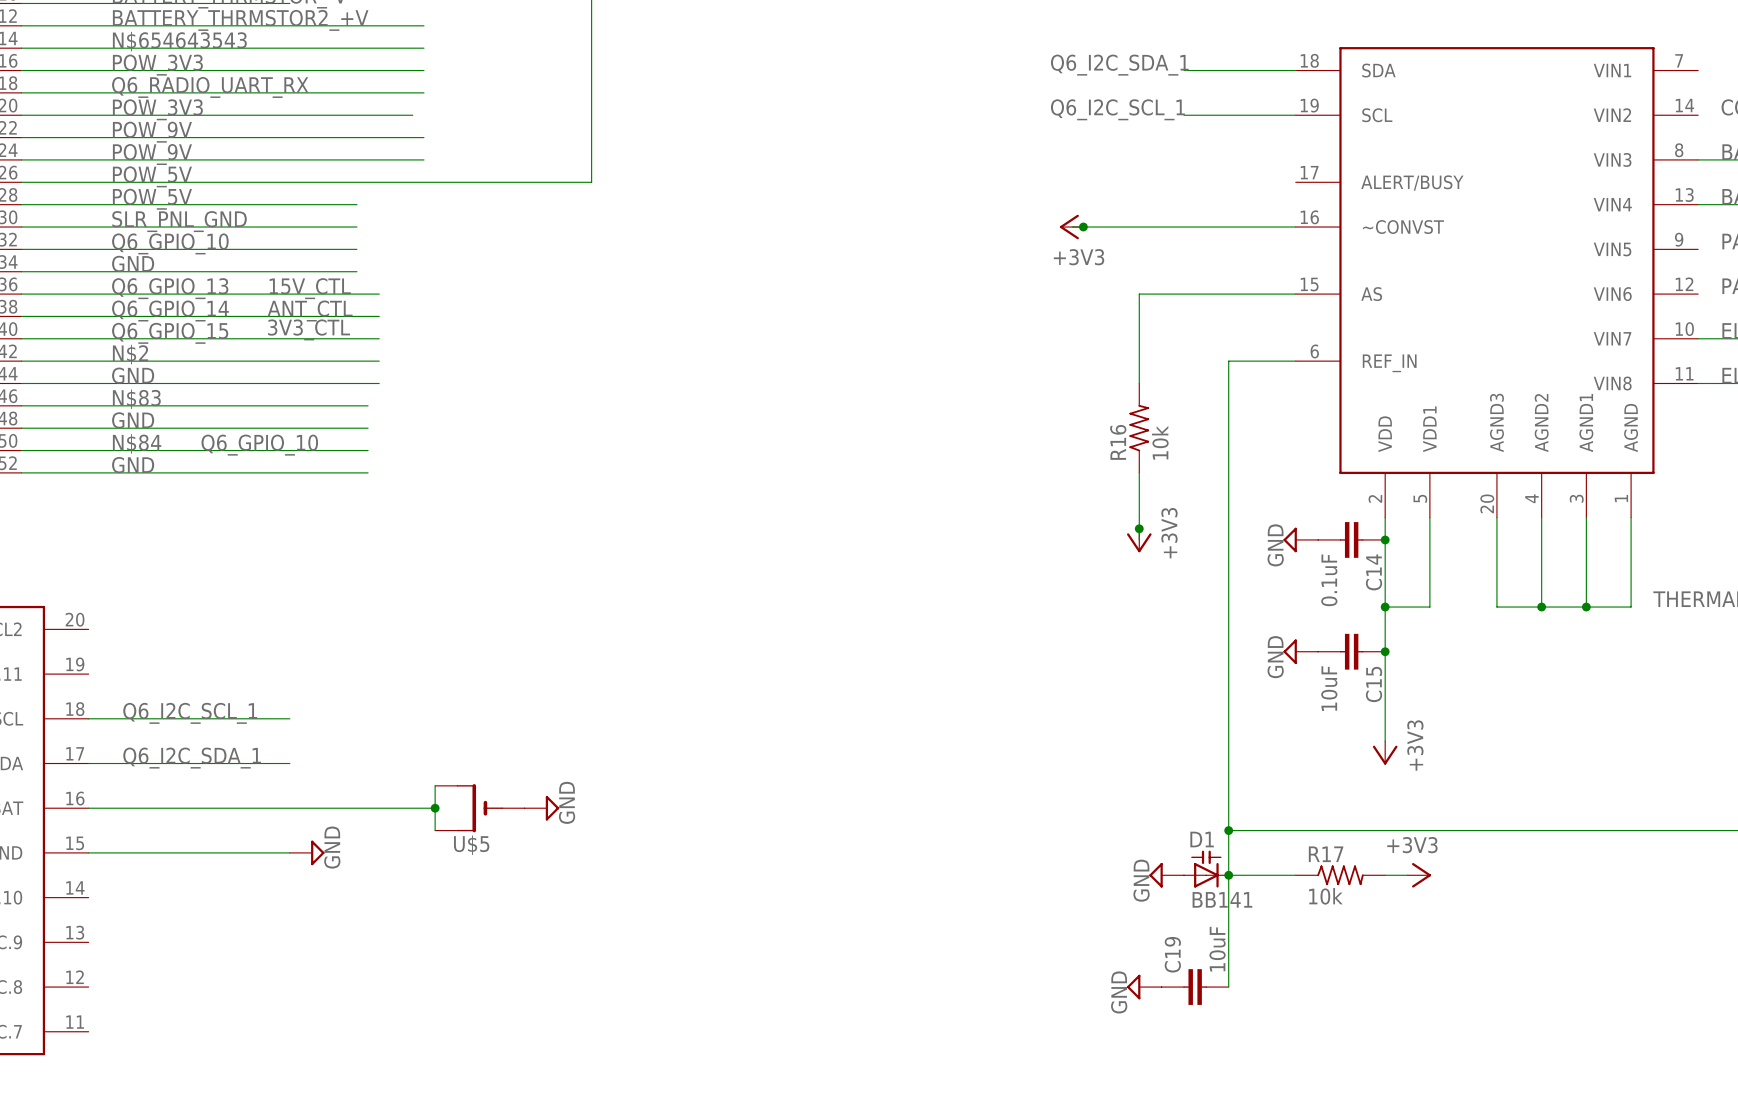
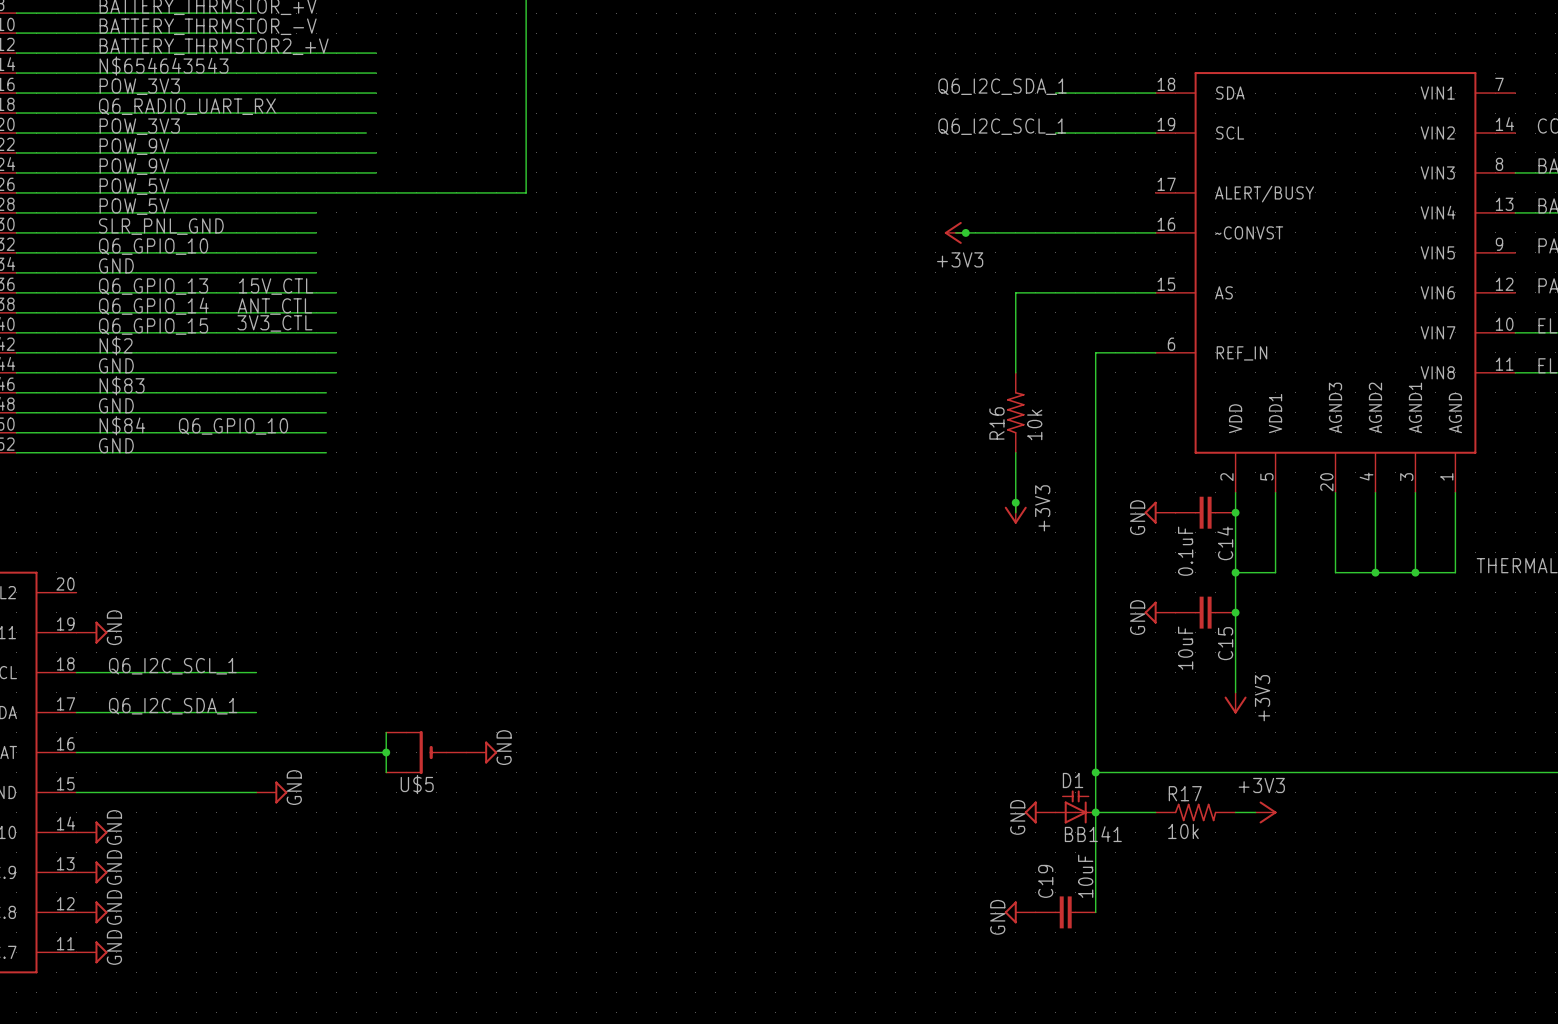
power symbol: none -> GND (91, 632)
power symbol: none -> GND (91, 832)
power symbol: none -> GND (91, 872)
power symbol: none -> GND (91, 912)
power symbol: none -> GND (91, 952)

